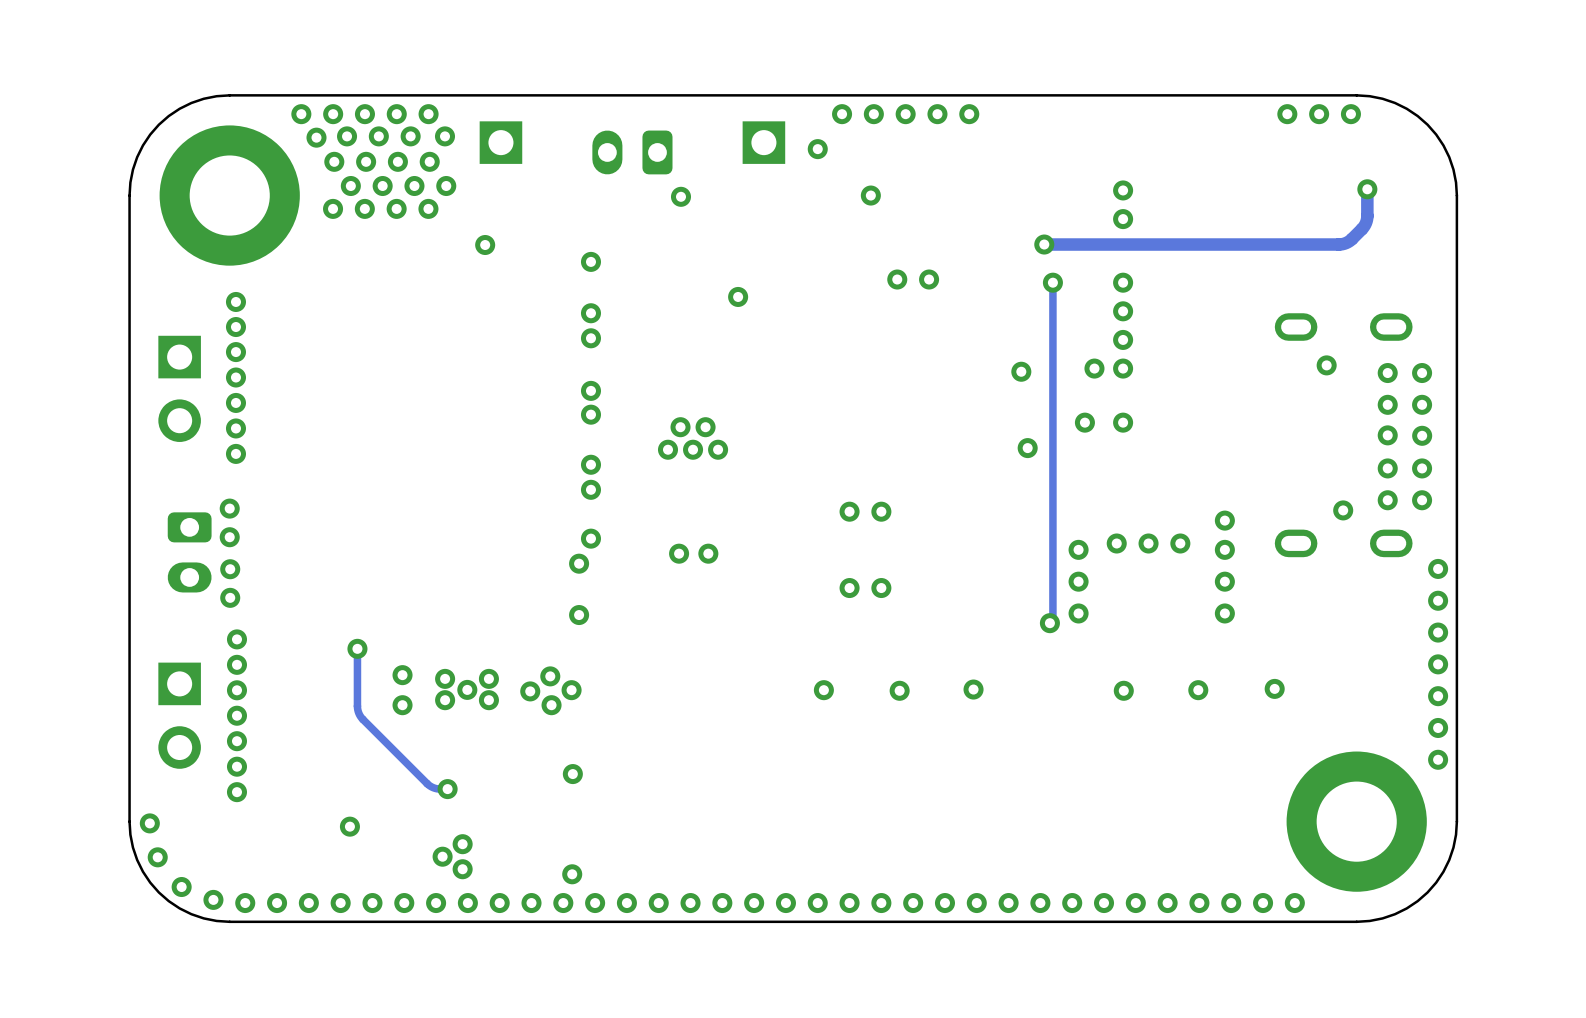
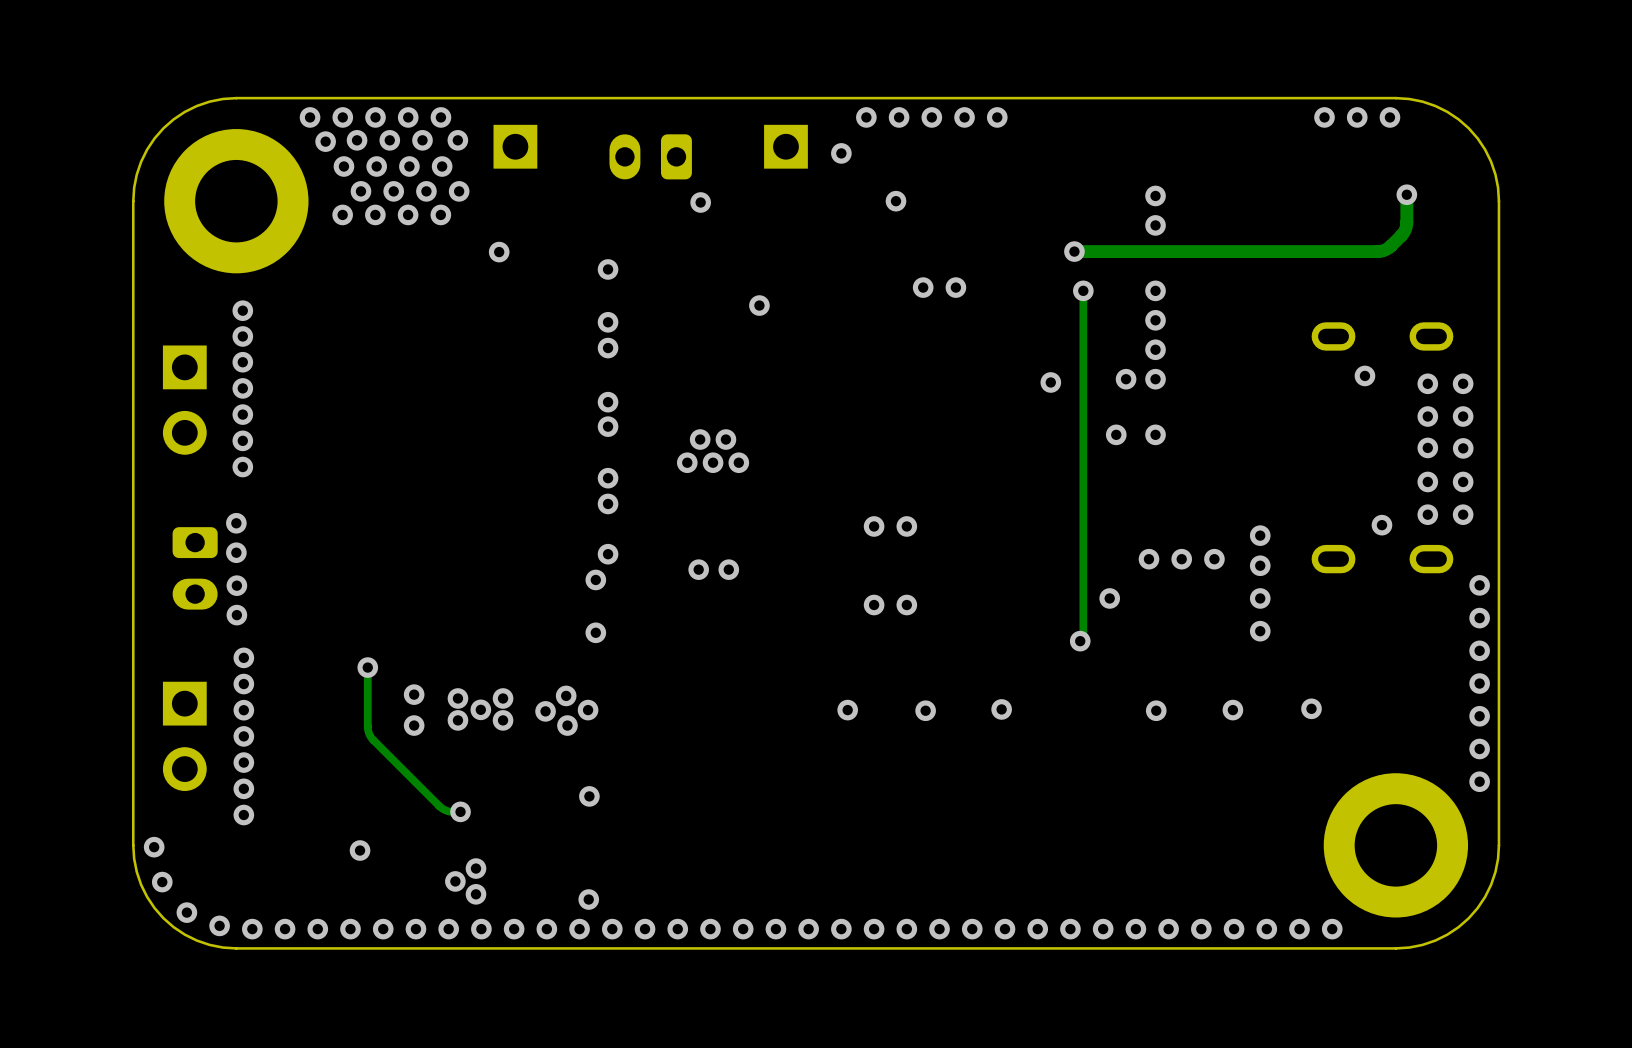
via: (1027, 448) -> none
via: (1078, 549) -> none
via: (1078, 613) -> none

